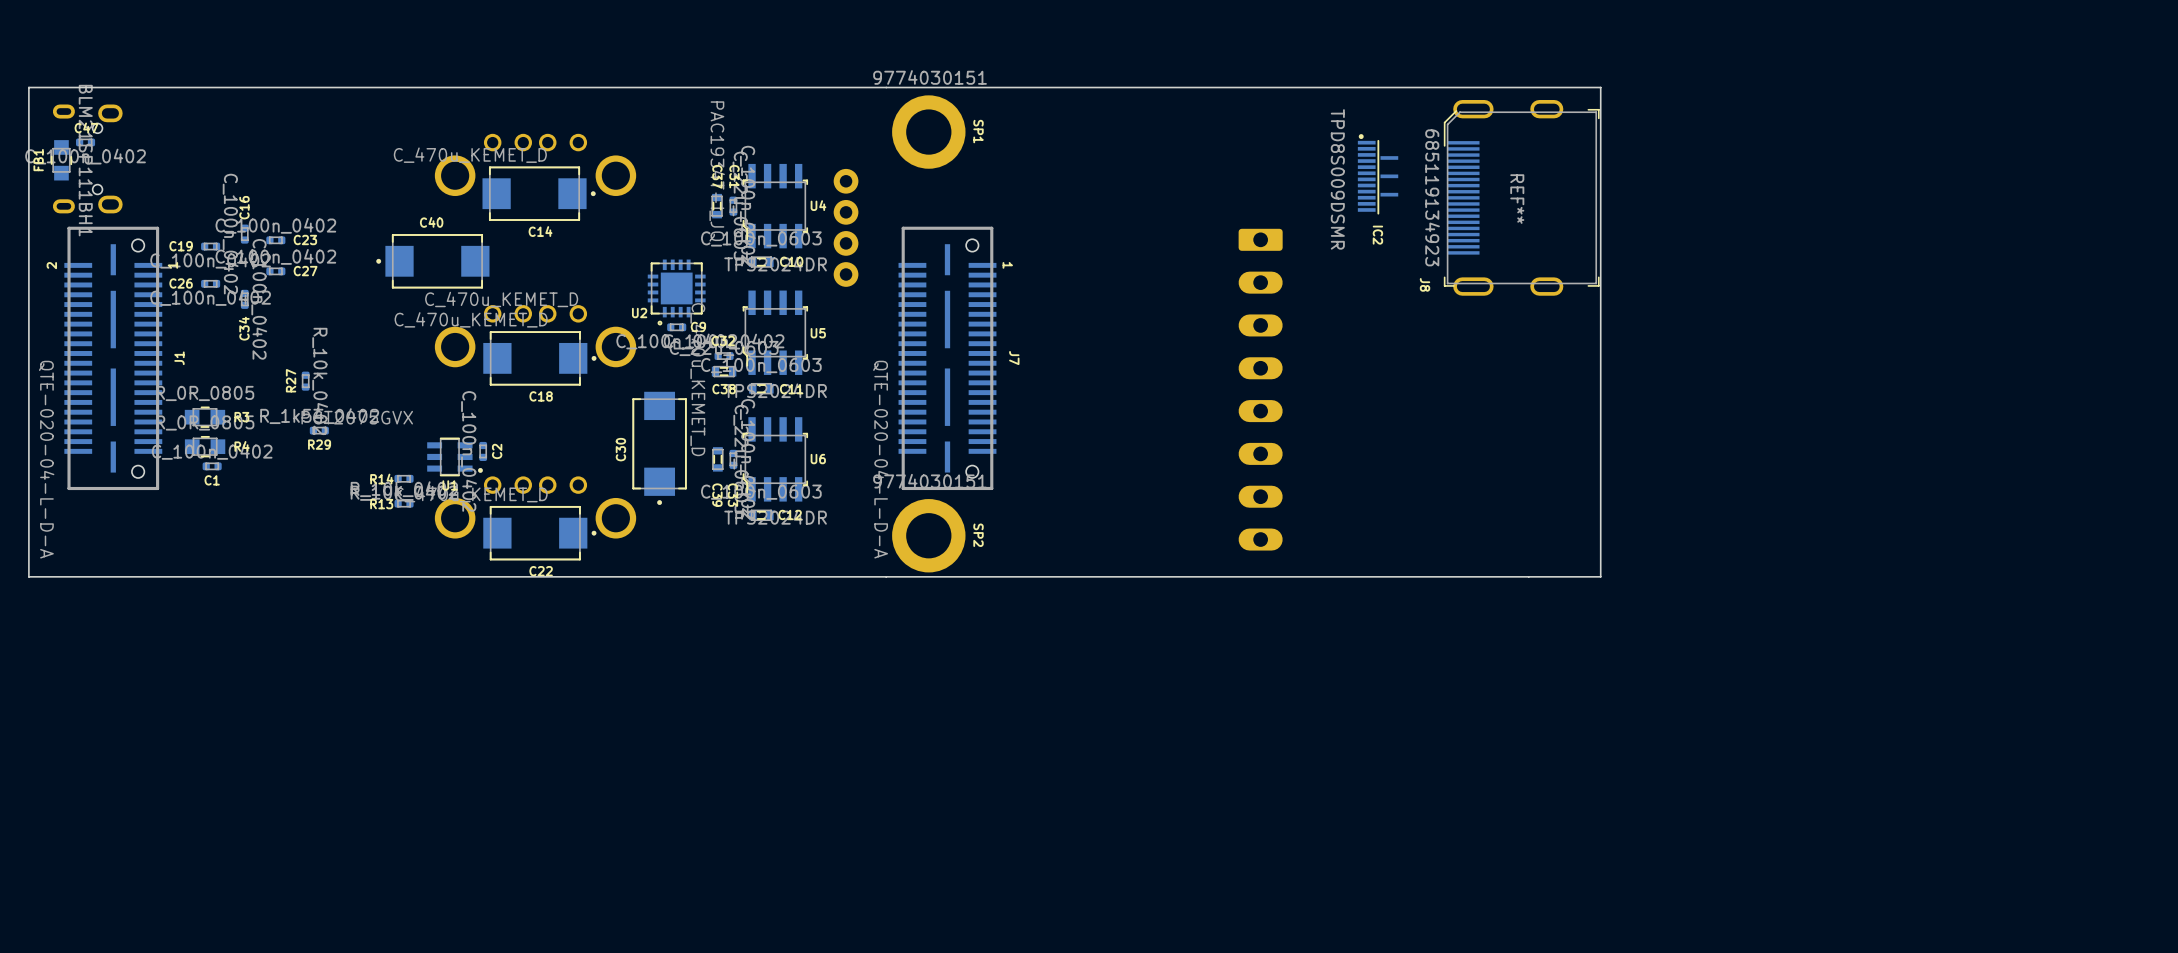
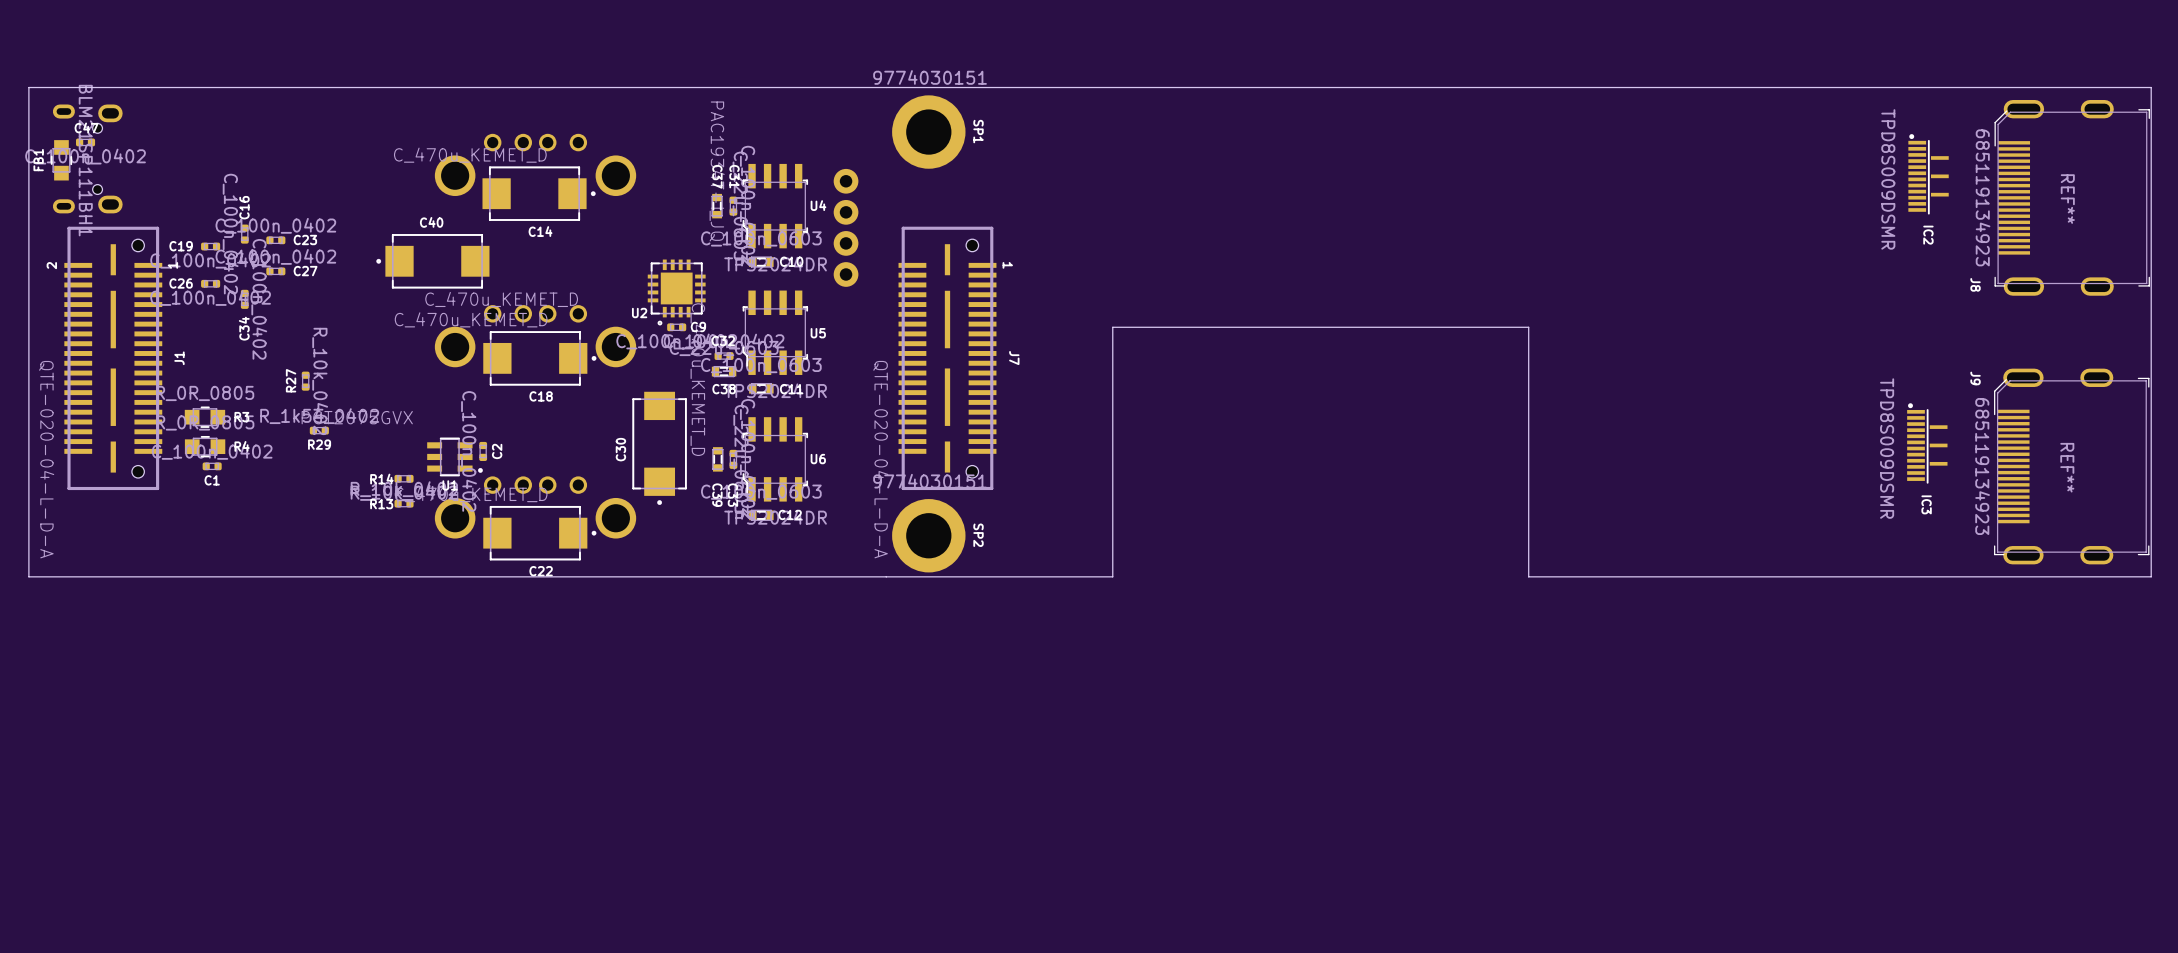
board edge: (1600, 87) (1600, 576) (1112, 576) -> (1600, 87) (2151, 87) (2151, 576) (1528, 576) (1528, 327) (1112, 327) (1112, 576)
IC2 position: (1378, 174) -> (1928, 174)
J8 position: (1521, 197) -> (2072, 197)
part: (1260, 389) -> none
IC3: none -> TPD8S009DSMR (1927, 443)
J9: none -> 685119134923 (2071, 466)

